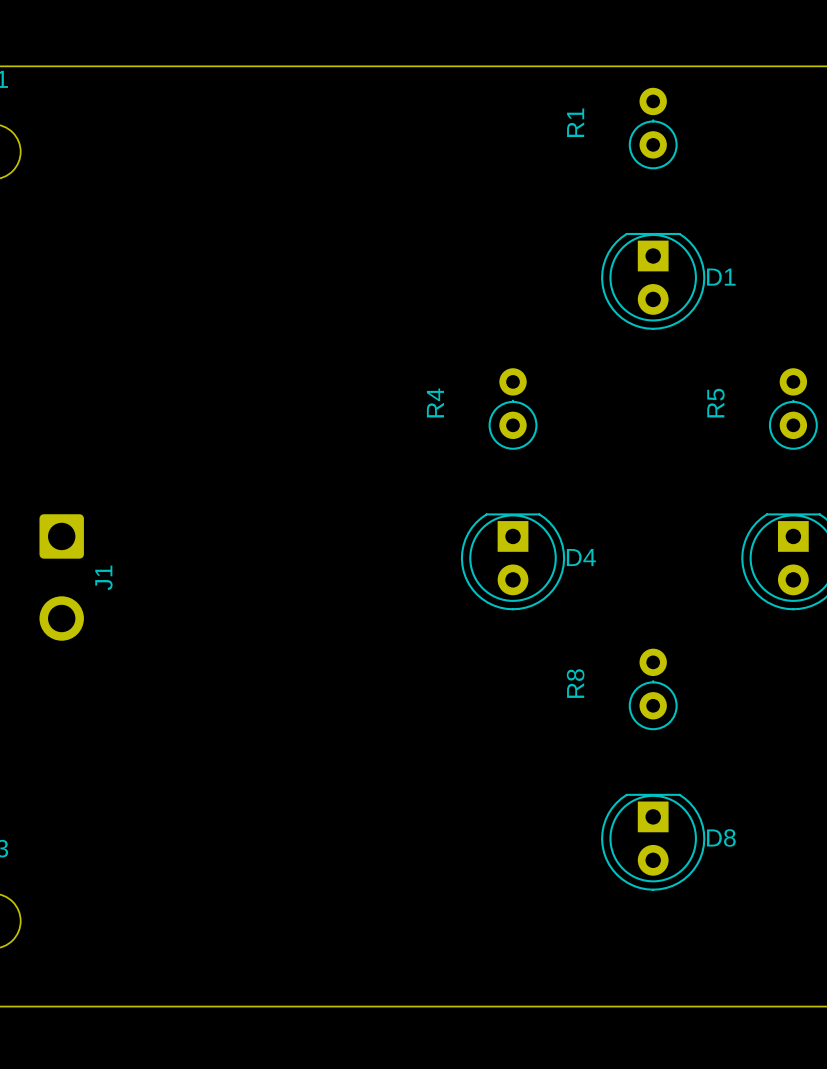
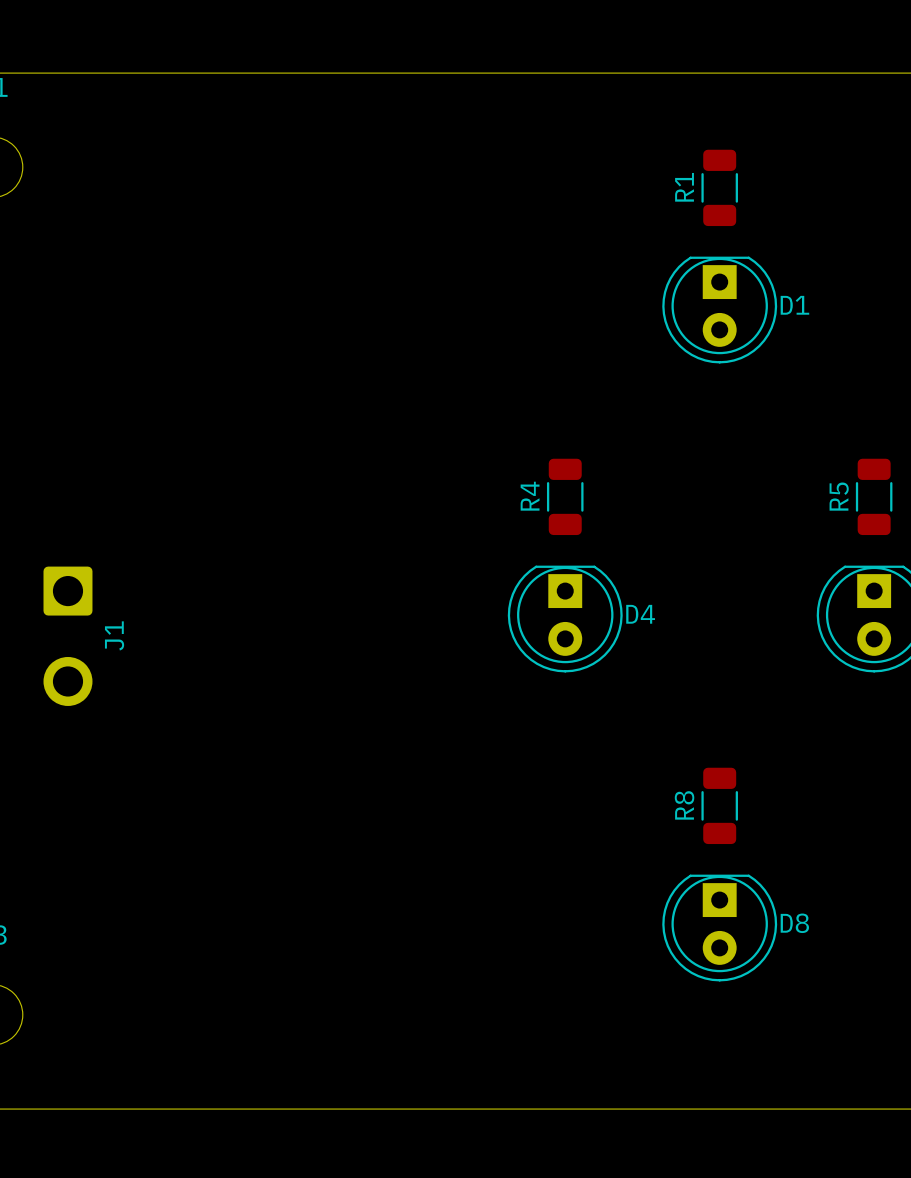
R1 footprint: [628, 87, 678, 170] -> [701, 149, 738, 227]
R1 name position: R1 (575, 122) -> R1 (684, 187)
R4 footprint: [488, 368, 538, 450] -> [546, 458, 584, 536]
R5 footprint: [768, 368, 818, 450] -> [855, 458, 893, 536]
R4 name position: R4 (435, 402) -> R4 (530, 496)
R5 name position: R5 (715, 403) -> R5 (839, 496)
R8 footprint: [628, 648, 678, 731] -> [701, 767, 738, 845]
R8 name position: R8 (575, 683) -> R8 (684, 805)

